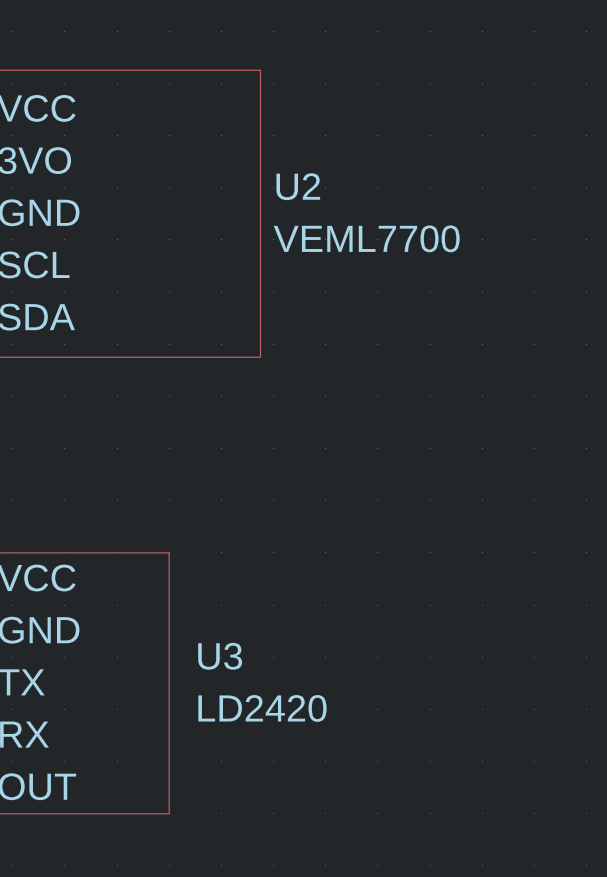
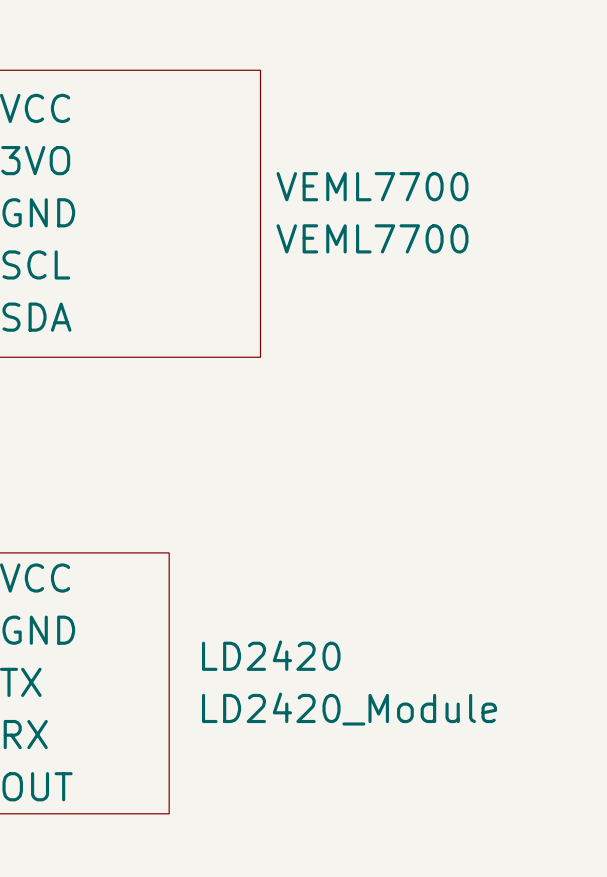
U2 name: U2 (298, 186) -> VEML7700 (372, 186)
U3 name: U3 (220, 656) -> LD2420 (271, 655)
U3 value: LD2420 (262, 708) -> LD2420_Module (349, 709)

